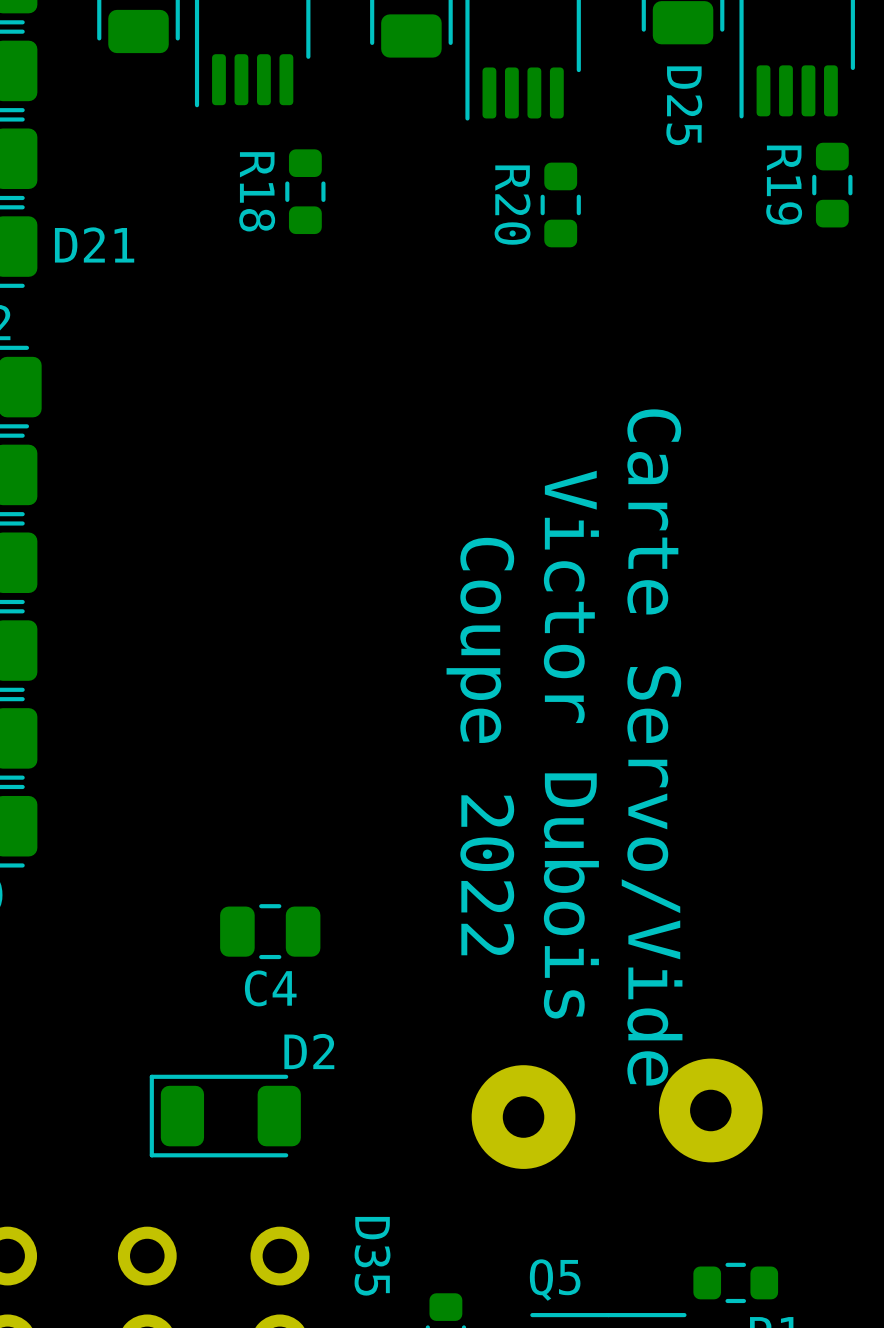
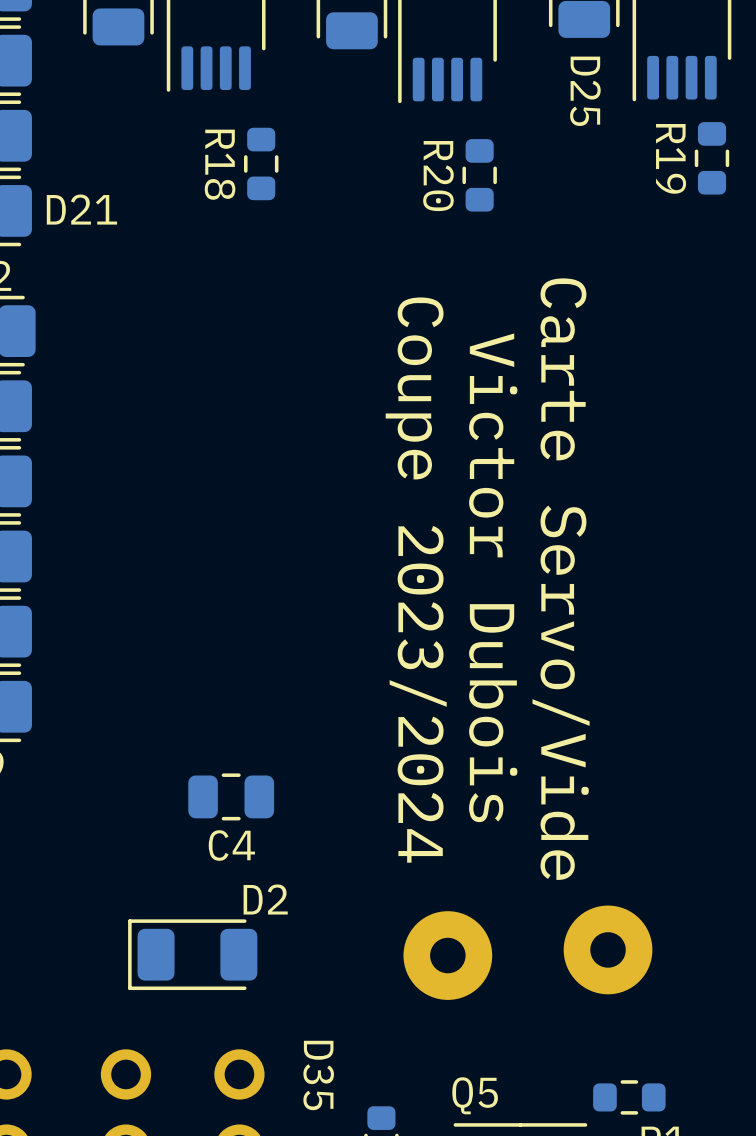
text position: Victor Dubois (571, 744) -> Victor Dubois (493, 577)
text: Coupe 2022 (480, 746) -> Coupe 2023/2024 (416, 580)
text position: Carte Servo/Vide (652, 747) -> Carte Servo/Vide (561, 579)

